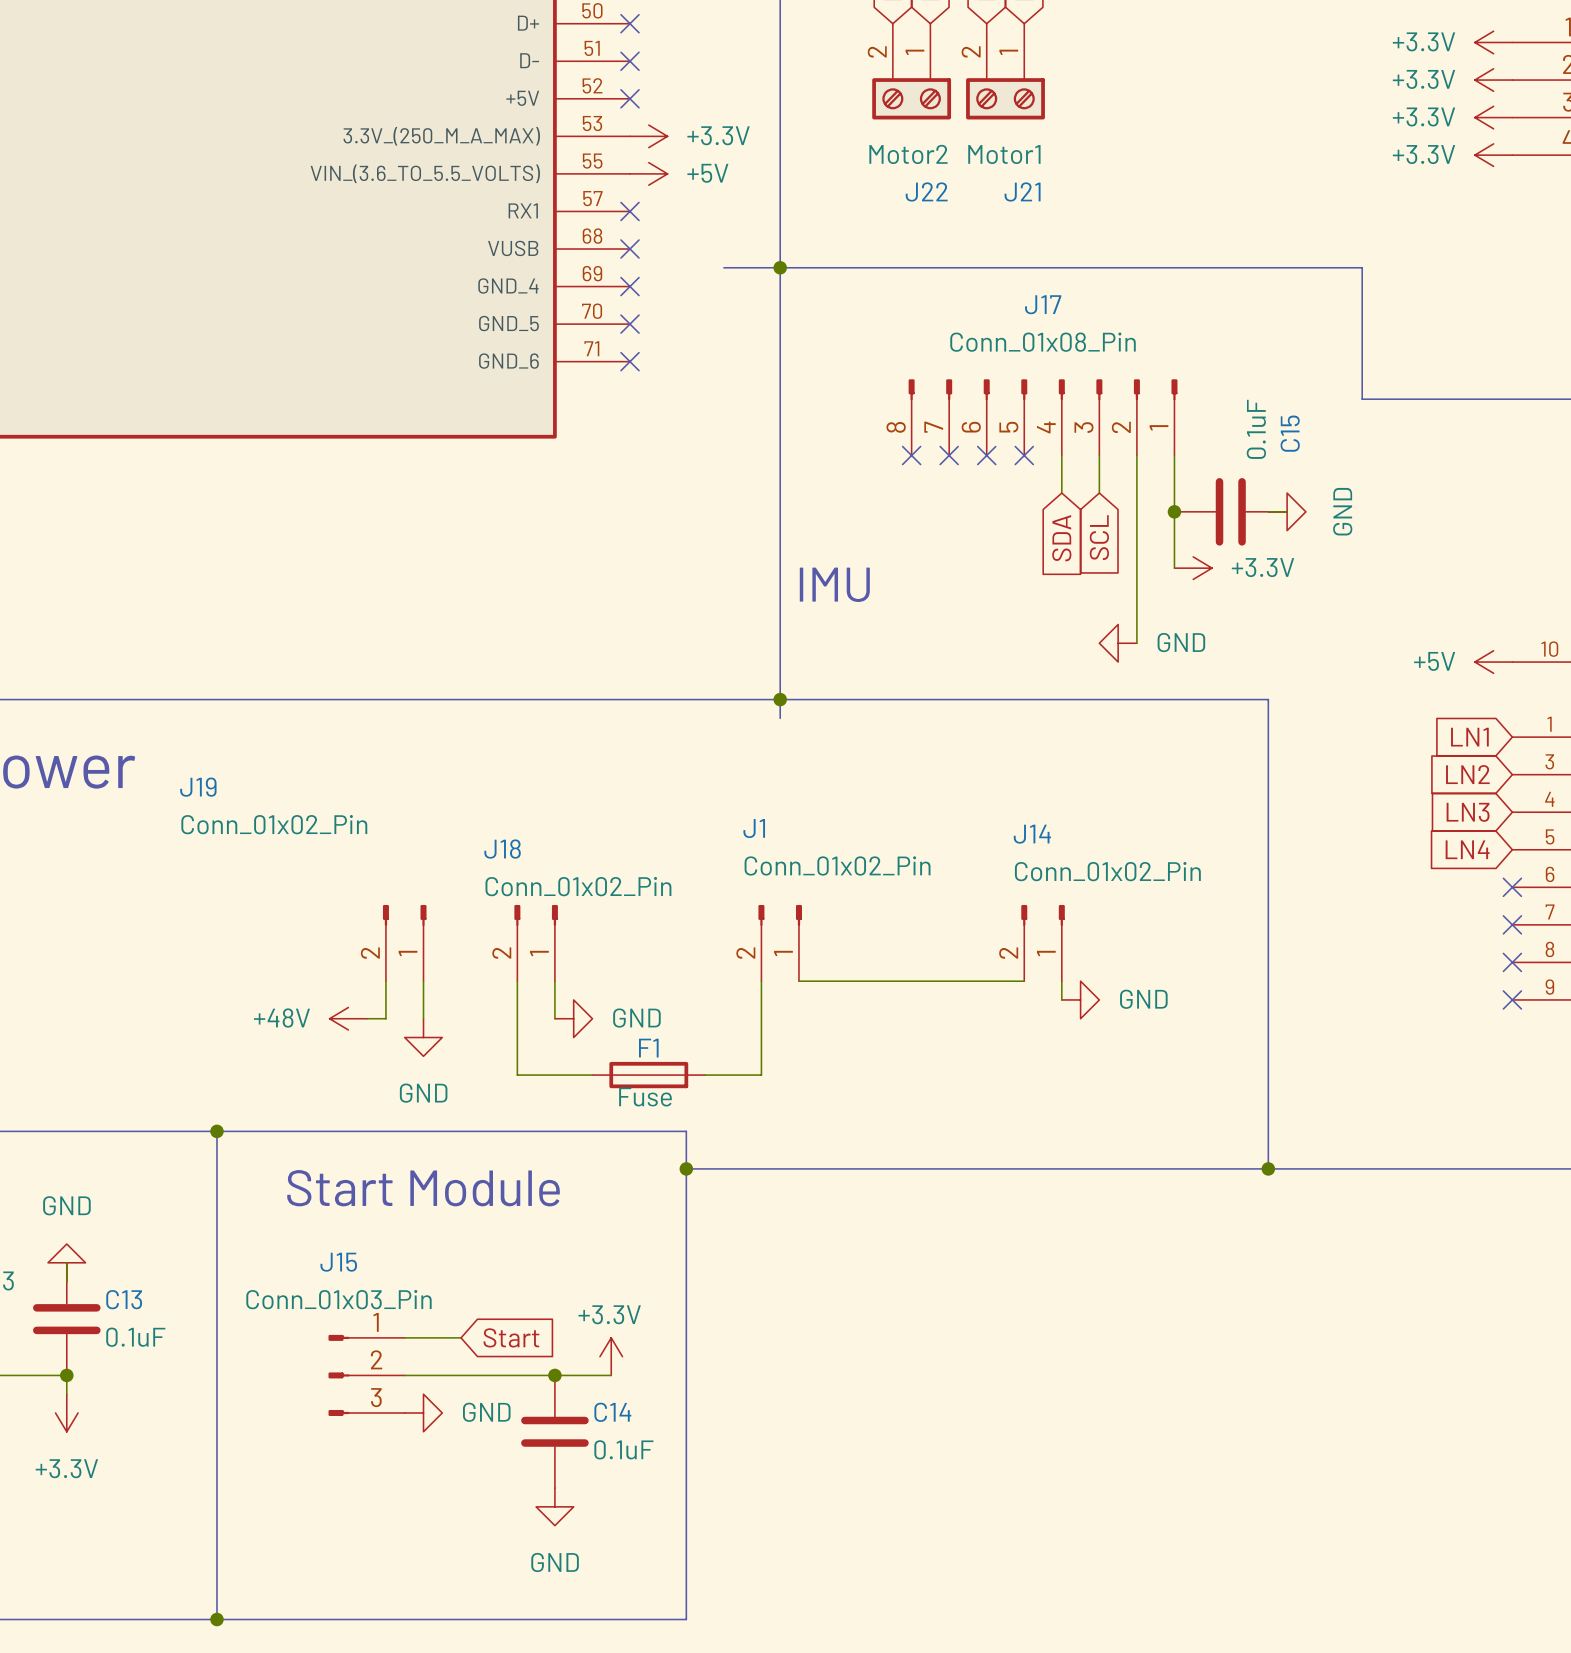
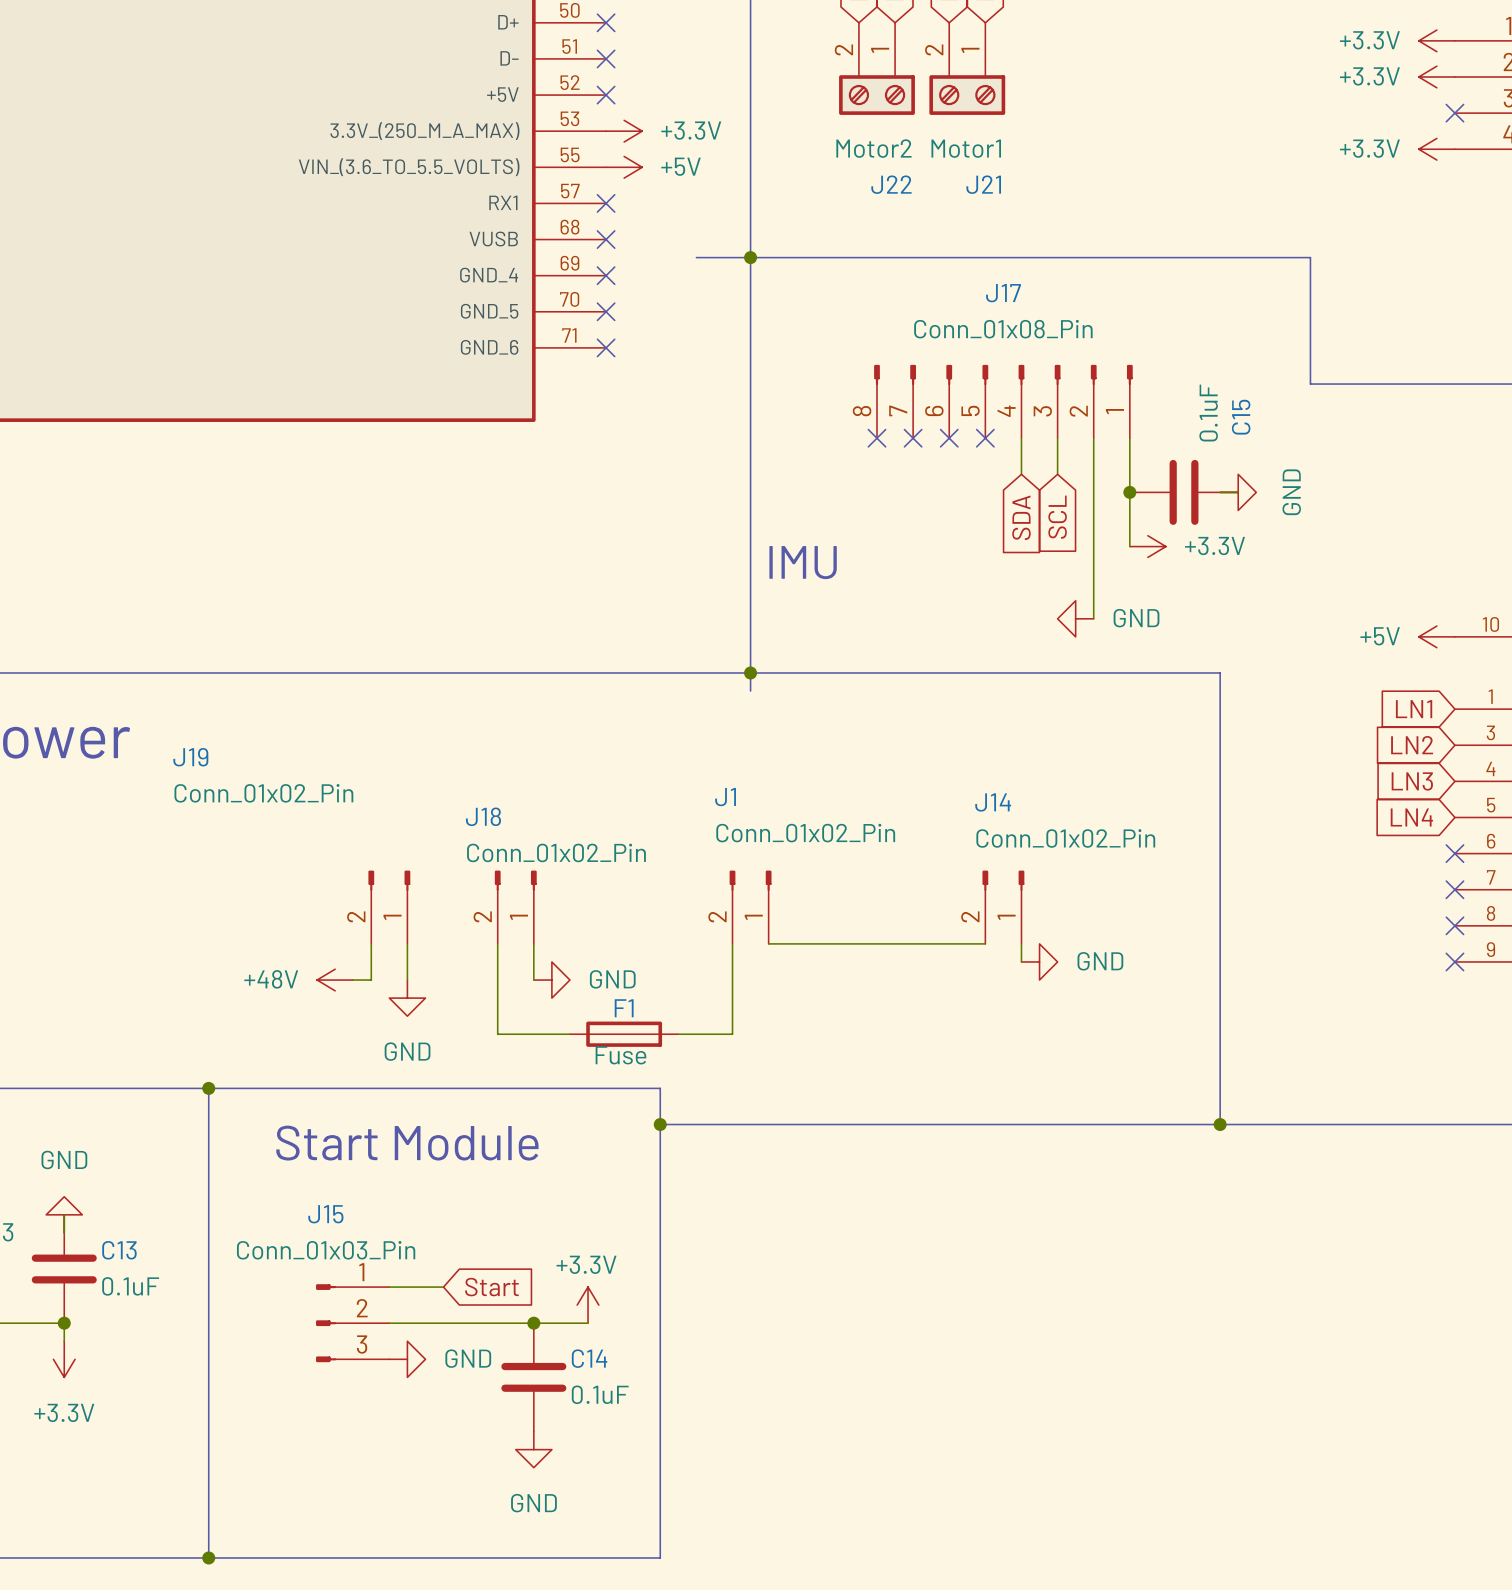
power symbol: +3.3V (1493, 117) -> none
no-connect mark: none -> (1454, 113)

